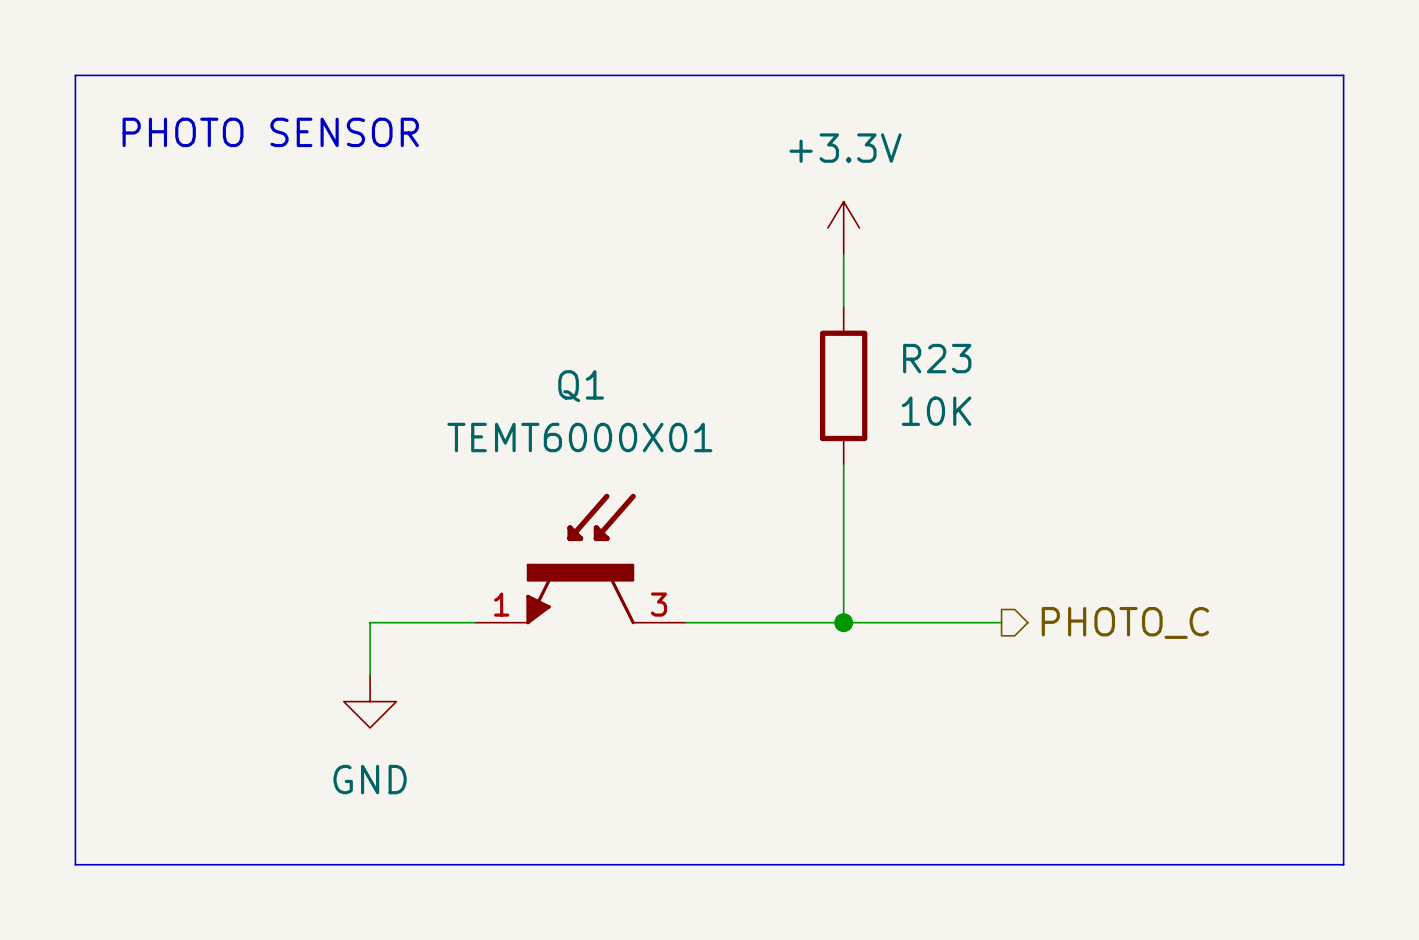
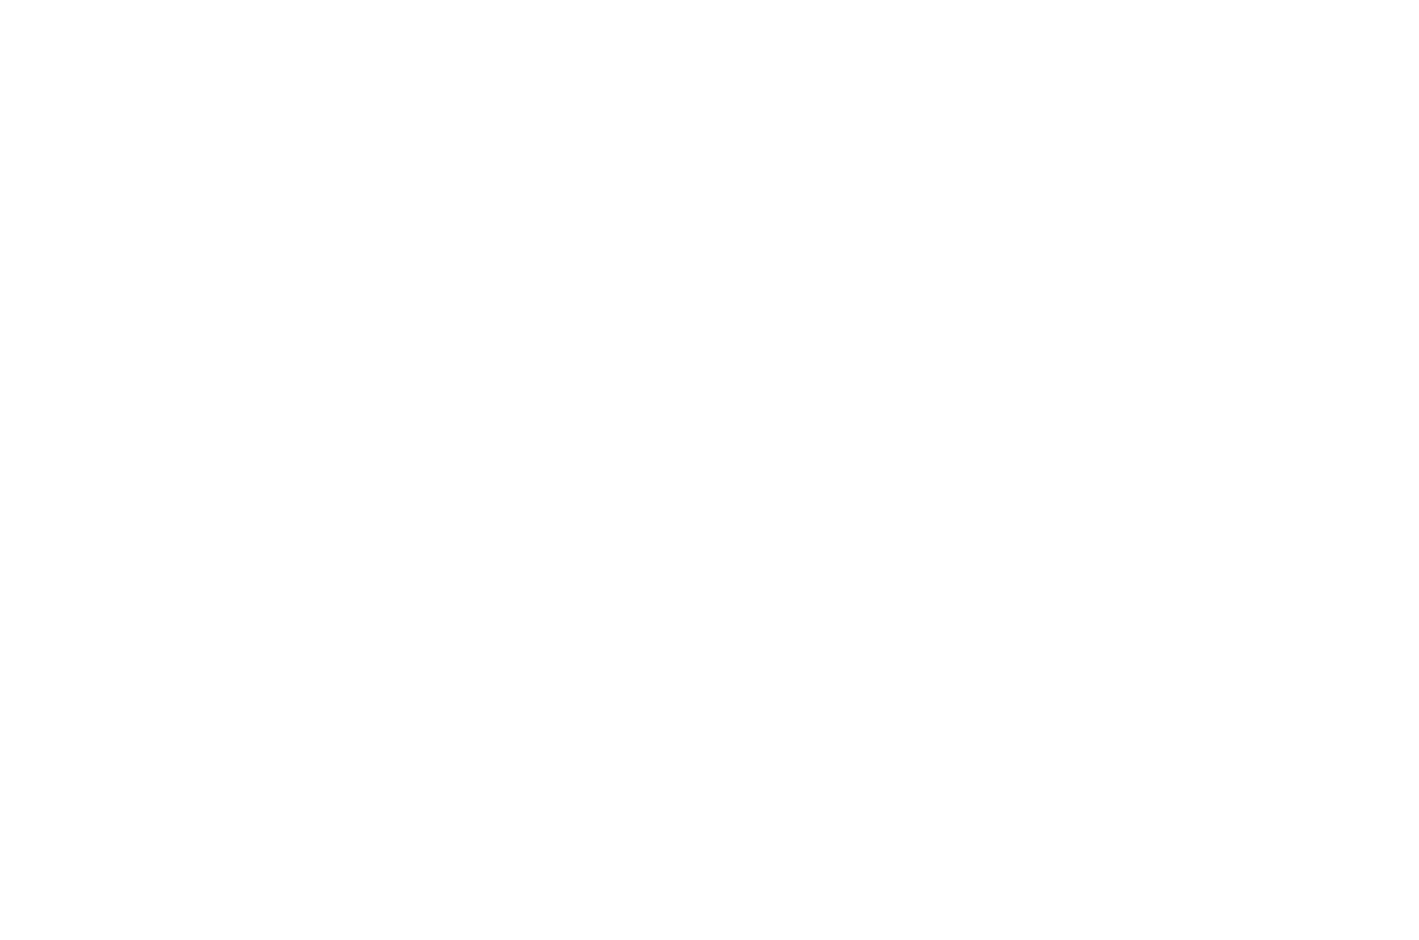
line: (75, 75) (1343, 75) (1343, 864) (75, 864) (75, 75) -> none
text: PHOTO SENSOR (270, 132) -> none
power symbol: +3.3V (843, 228) -> none
wire: (843, 254) (843, 306) -> none
R23: 10K (843, 385) -> none
wire: (843, 464) (843, 622) -> none
Q1: TEMT6000X01 (580, 559) -> none
wire: (475, 622) (370, 622) (370, 675) -> none
wire: (685, 622) (1001, 622) -> none
junction: (843, 622) -> none
hierarchical label: PHOTO_C (1125, 622) -> none
power symbol: GND (370, 701) -> none

